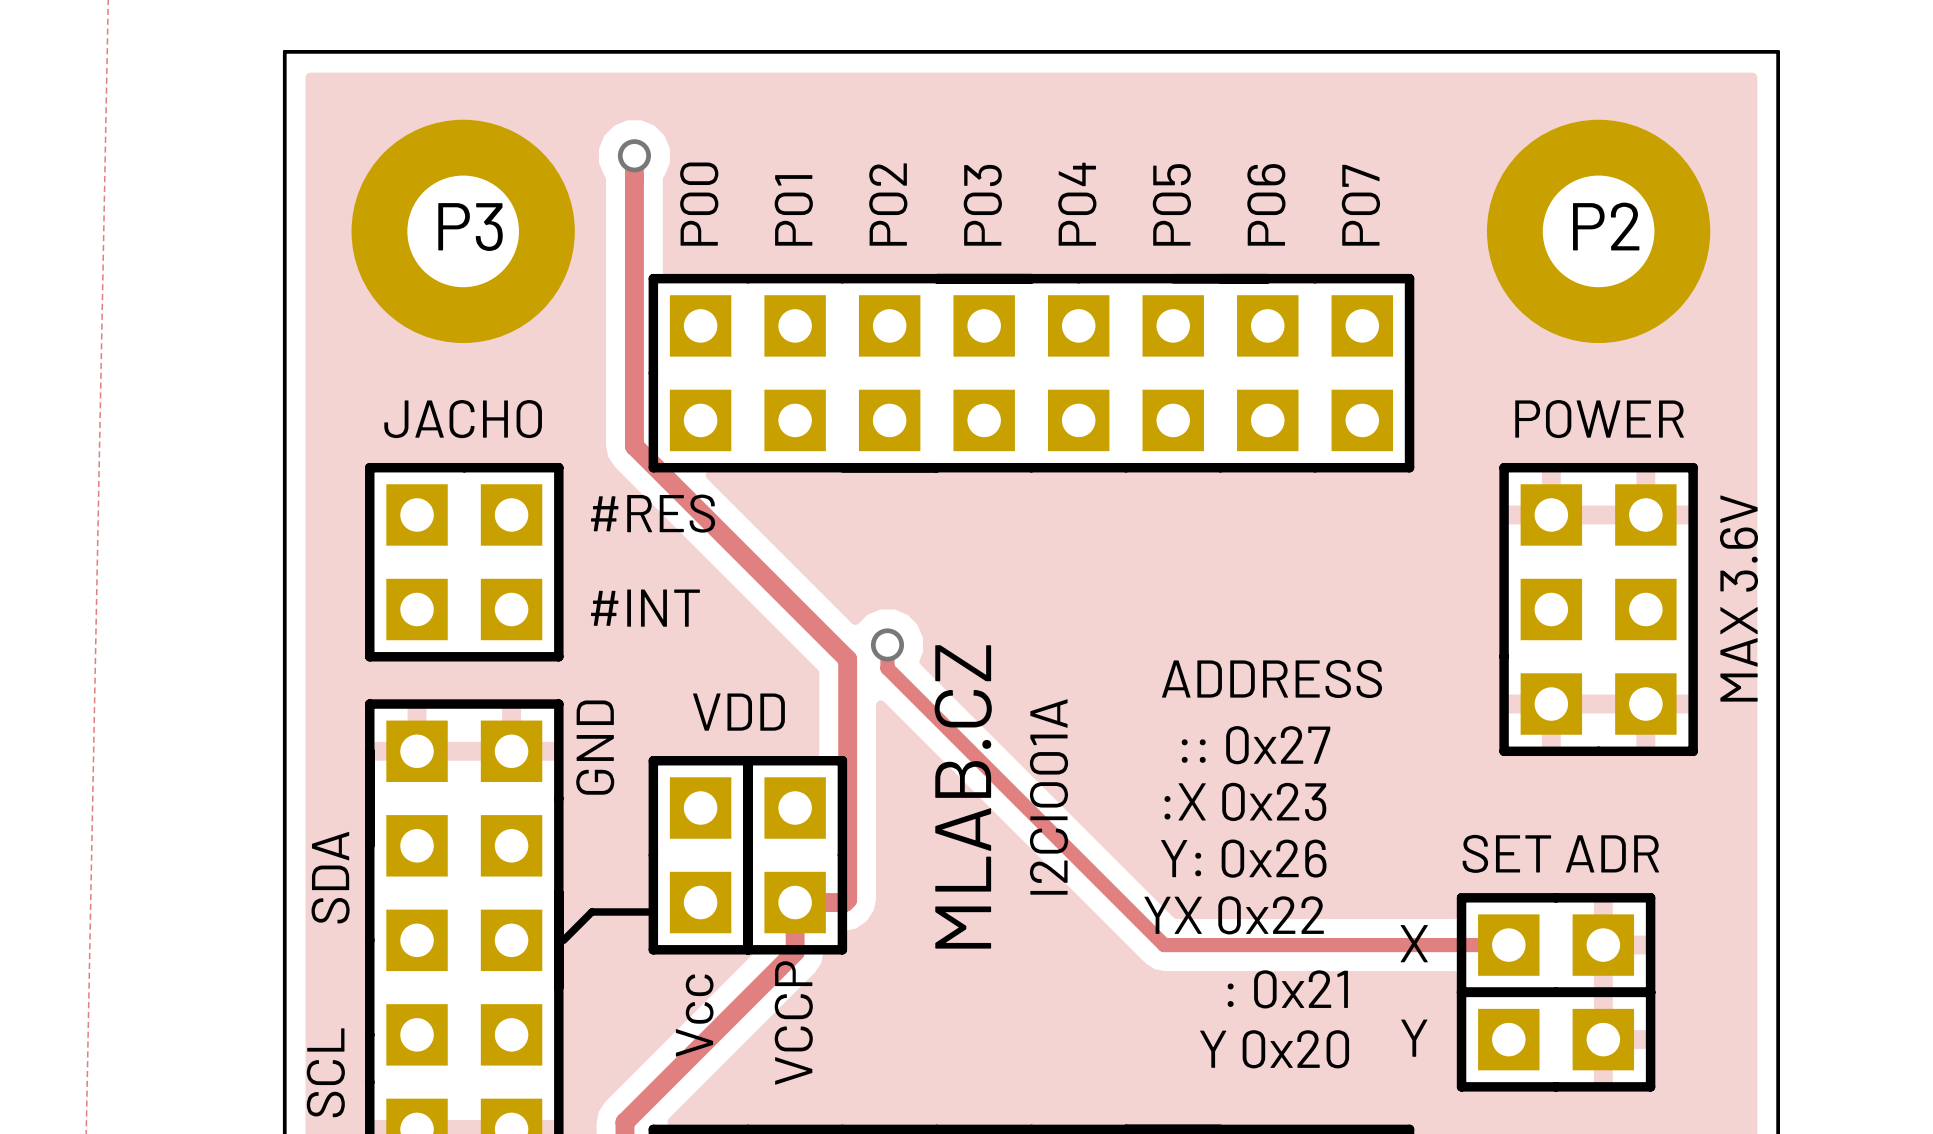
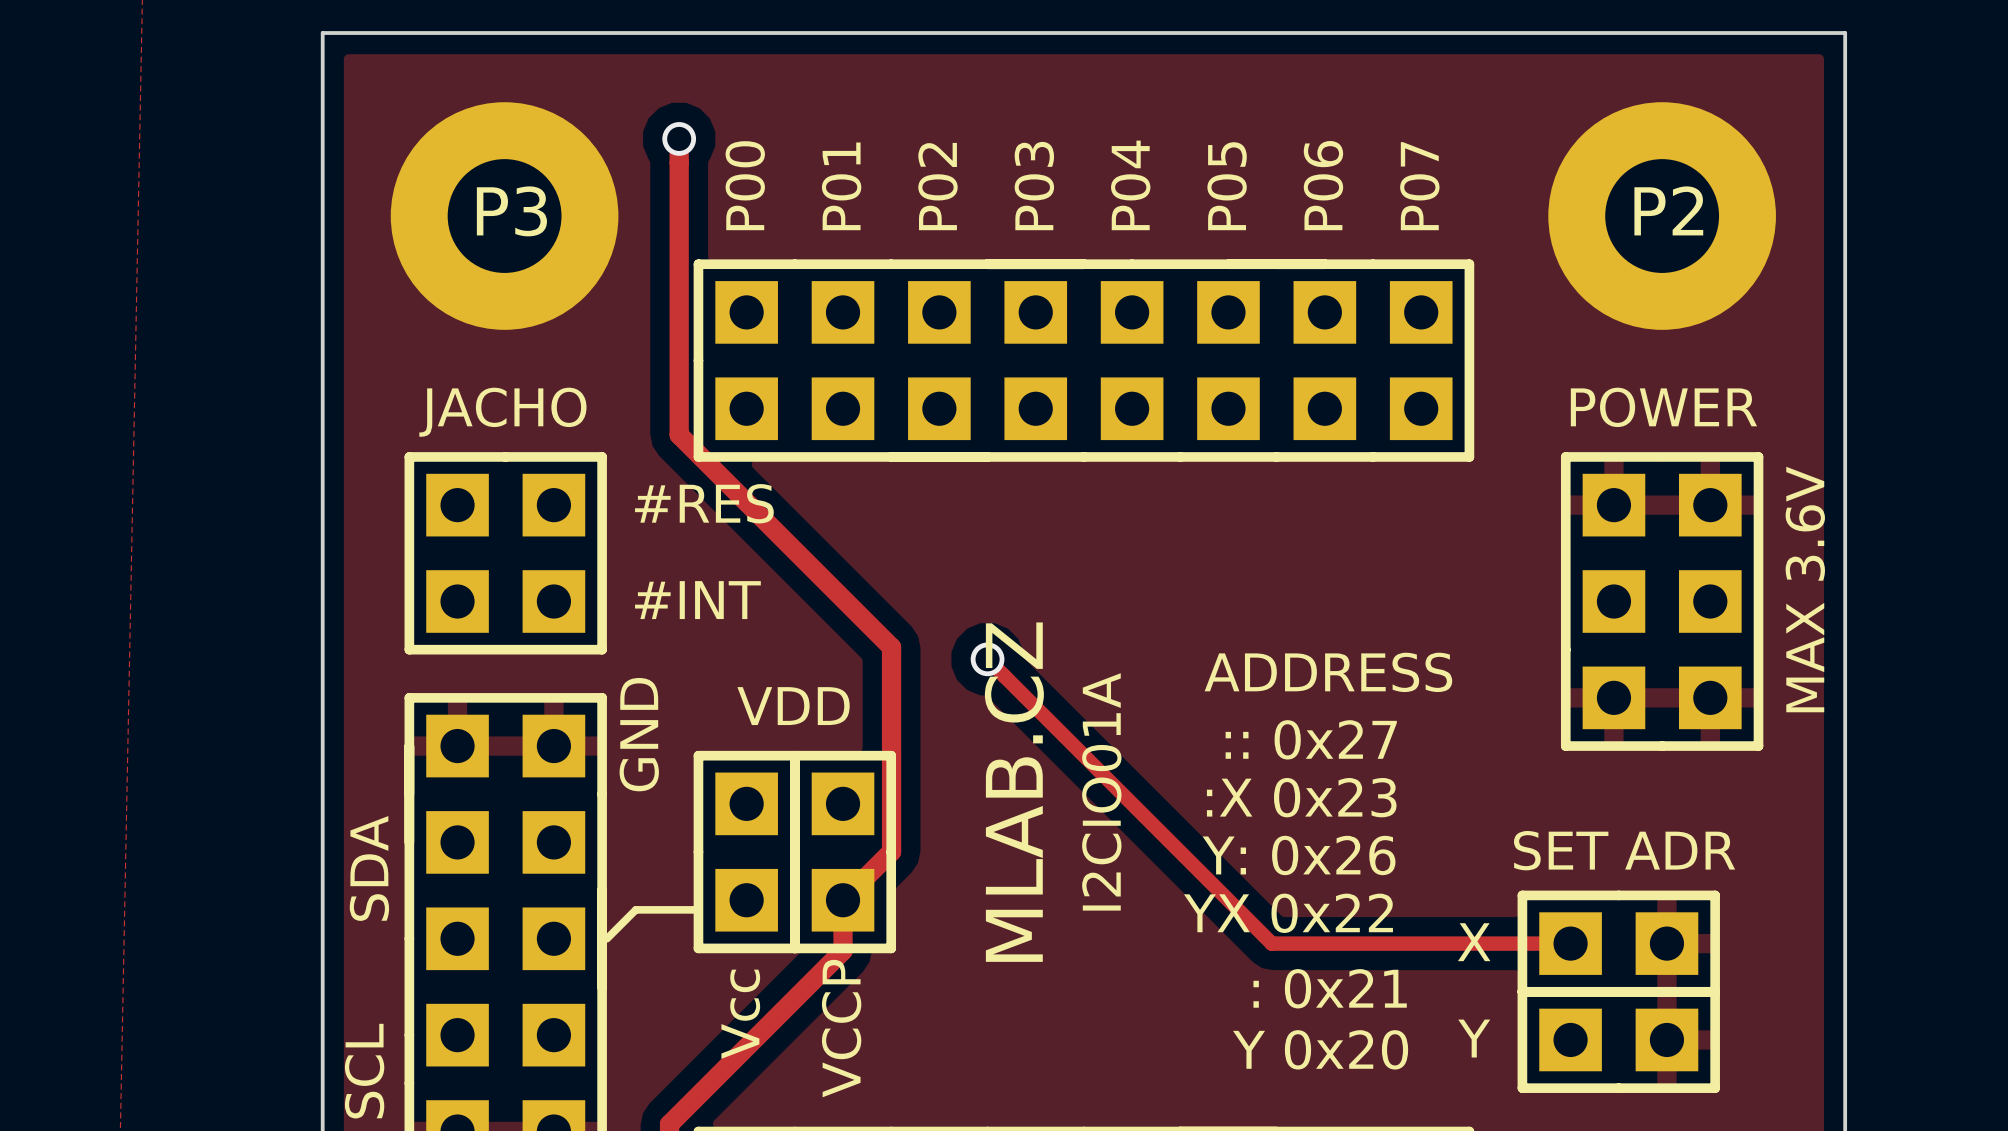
track: (887, 644) (887, 668) (1164, 945) (1215, 945) -> (987, 659) (1271, 943)
via position: (887, 644) -> (987, 659)
track: (842, 654) (847, 659) (847, 899) (844, 902) (795, 902) -> (891, 647) (891, 851) (843, 900)

